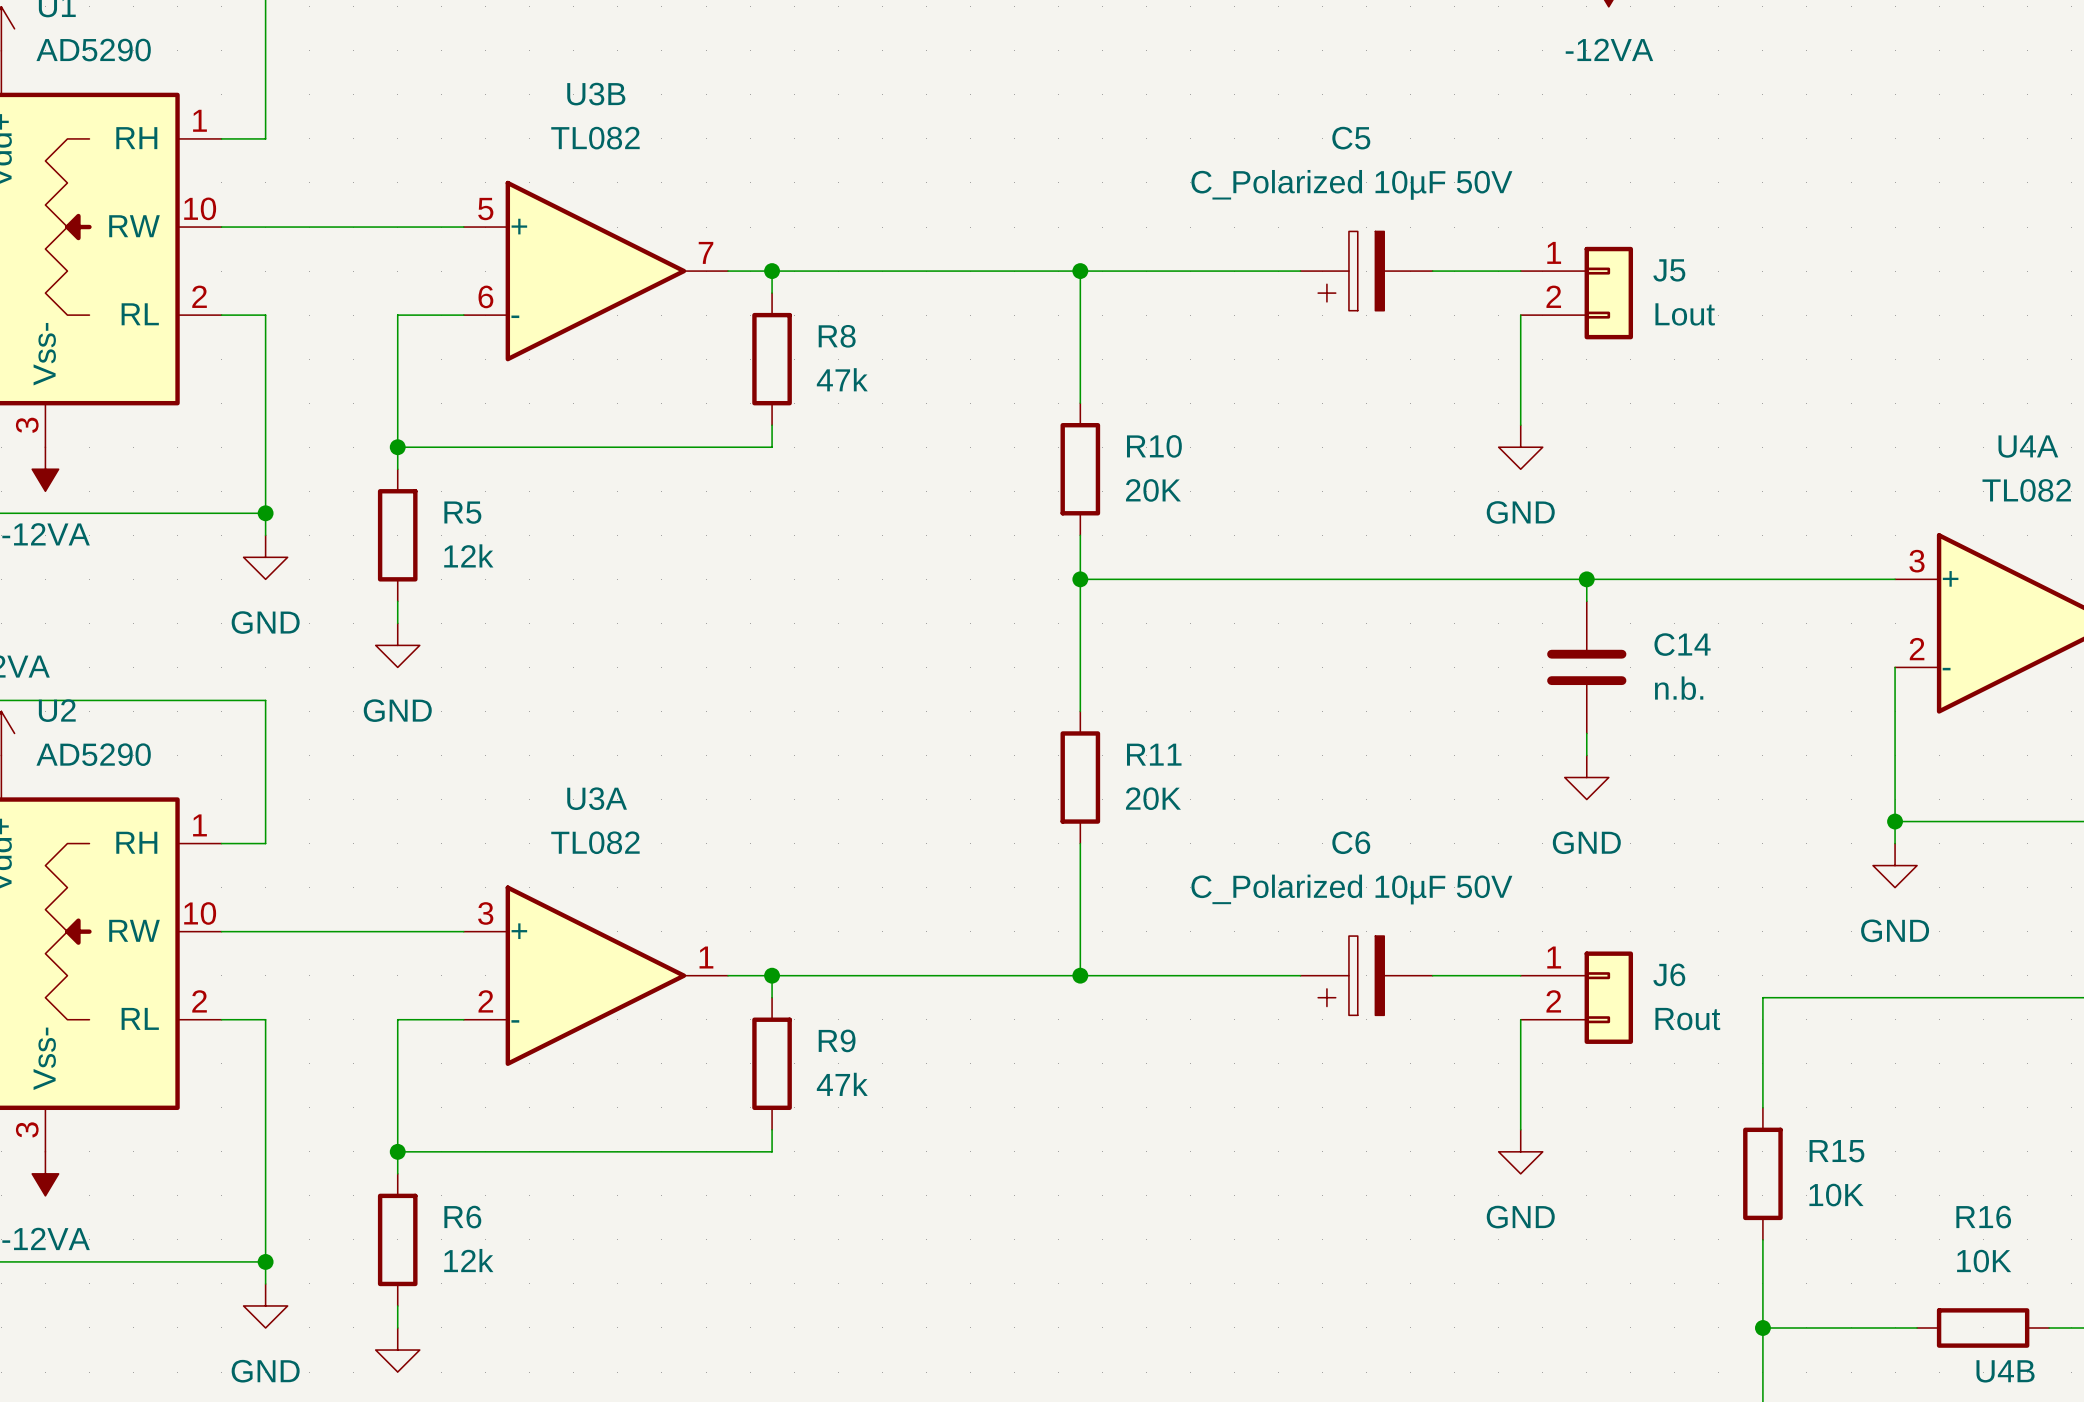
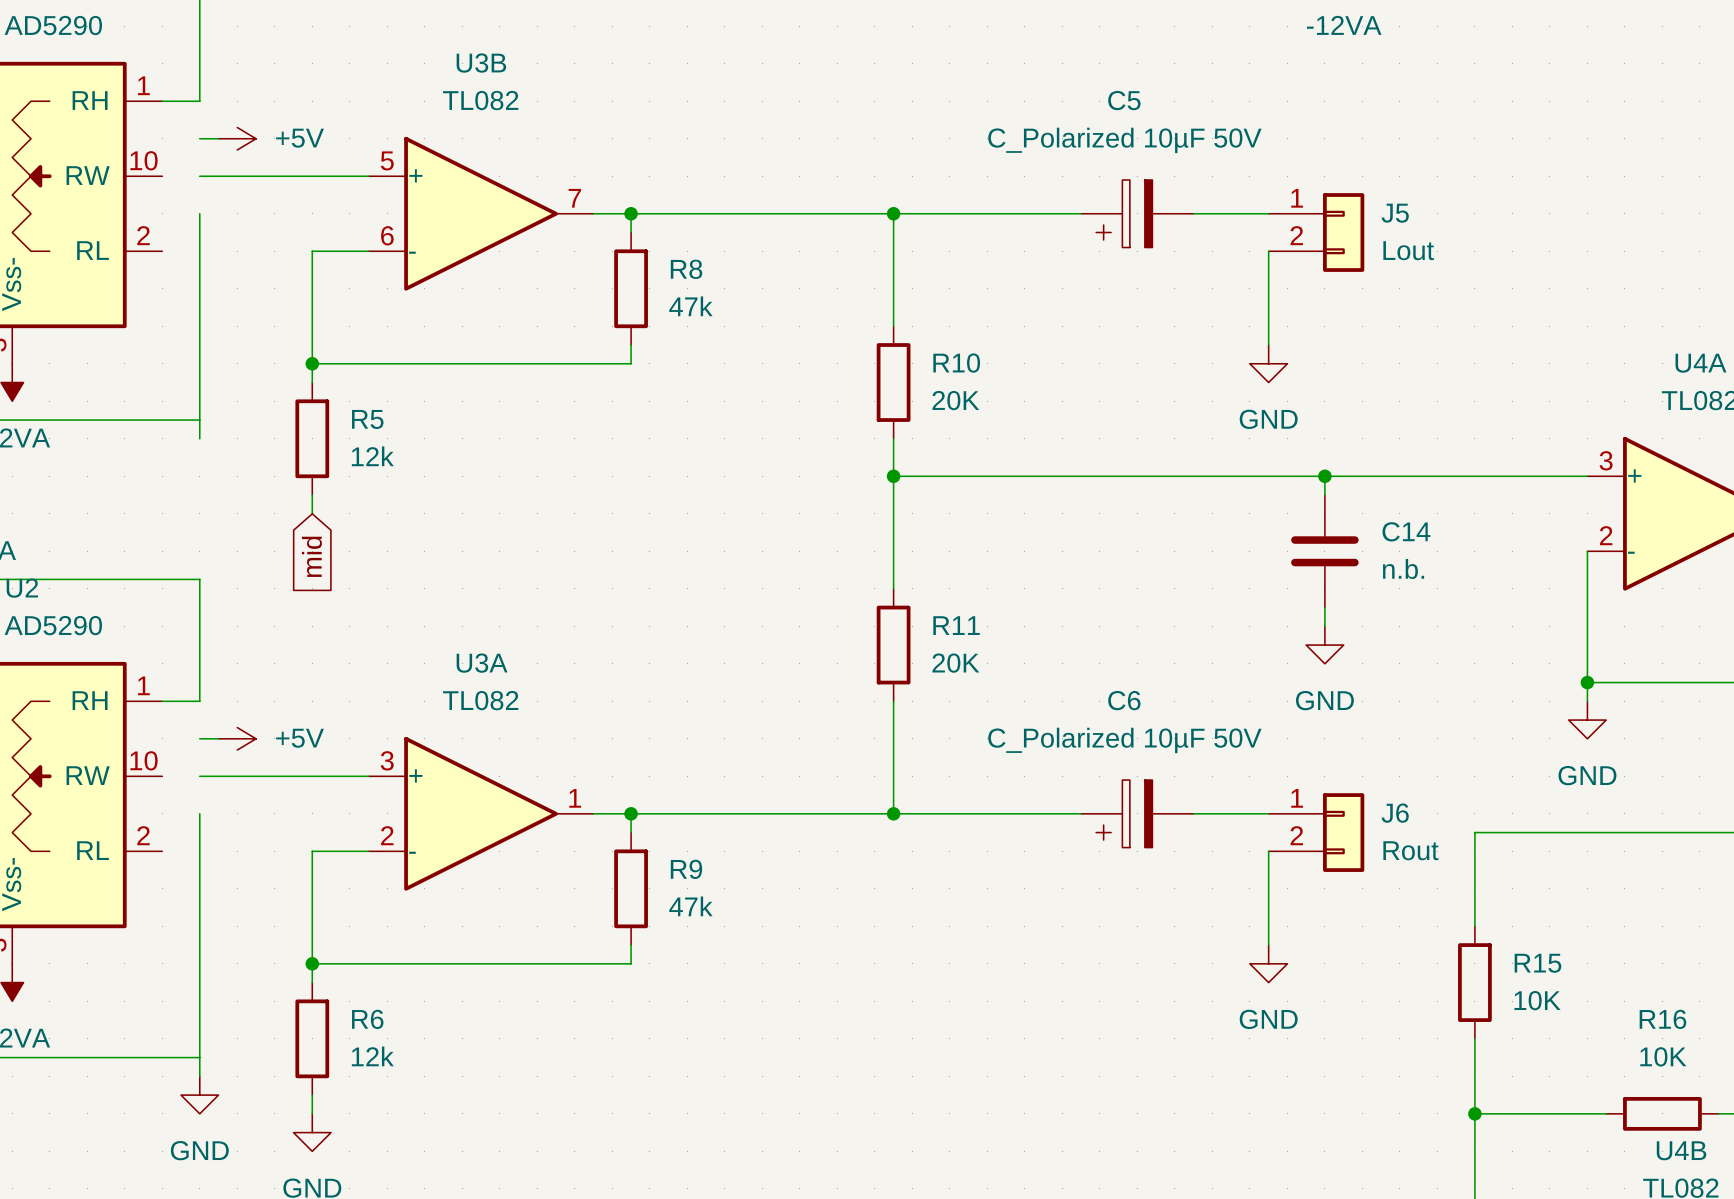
wire: none -> (199, 138) (218, 138)
power symbol: none -> +5V (237, 138)
wire: (221, 227) (265, 227) -> none
wire: (221, 315) (265, 315) -> (199, 213) (199, 251)
junction: (265, 513) -> none
power symbol: GND (265, 557) -> none
power symbol: GND (397, 645) -> none
global label: none -> mid (311, 556)
wire: none -> (199, 738) (218, 738)
power symbol: none -> +5V (237, 738)
wire: (221, 931) (265, 931) -> none
wire: (221, 1019) (265, 1019) -> (199, 813) (199, 851)
junction: (265, 1261) -> none

